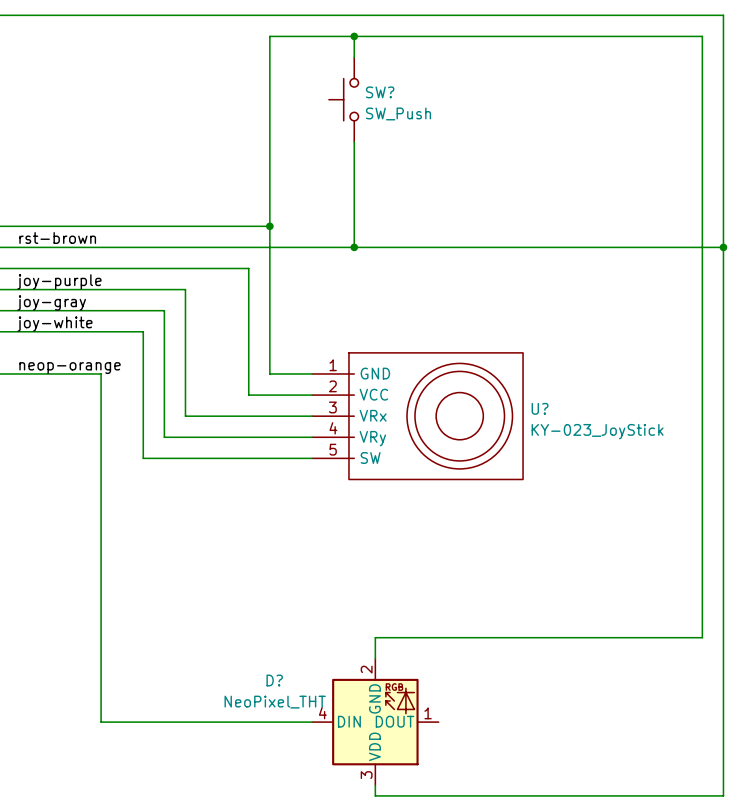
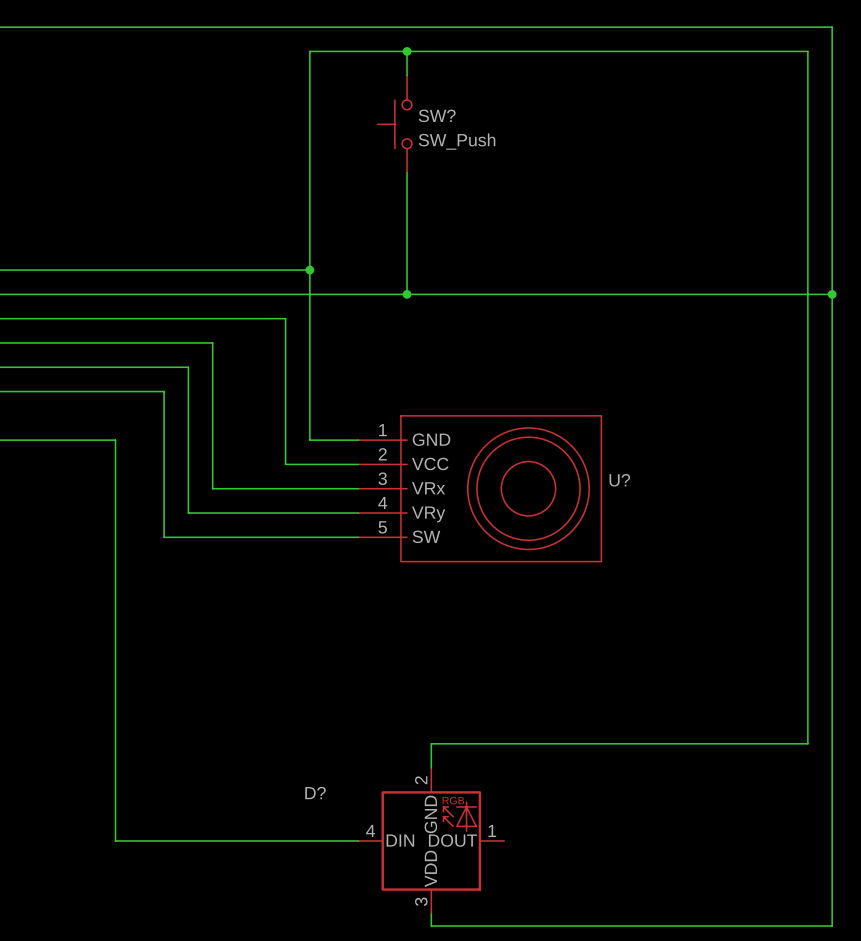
label: rst-brown (57, 237) -> none
label: joy-purple (59, 281) -> none
label: joy-gray (51, 303) -> none
label: joy-white (54, 324) -> none
label: neop-orange (70, 368) -> none
U? value: KY-023_JoyStick (597, 431) -> none
D? value: NeoPixel_THT (275, 702) -> none

